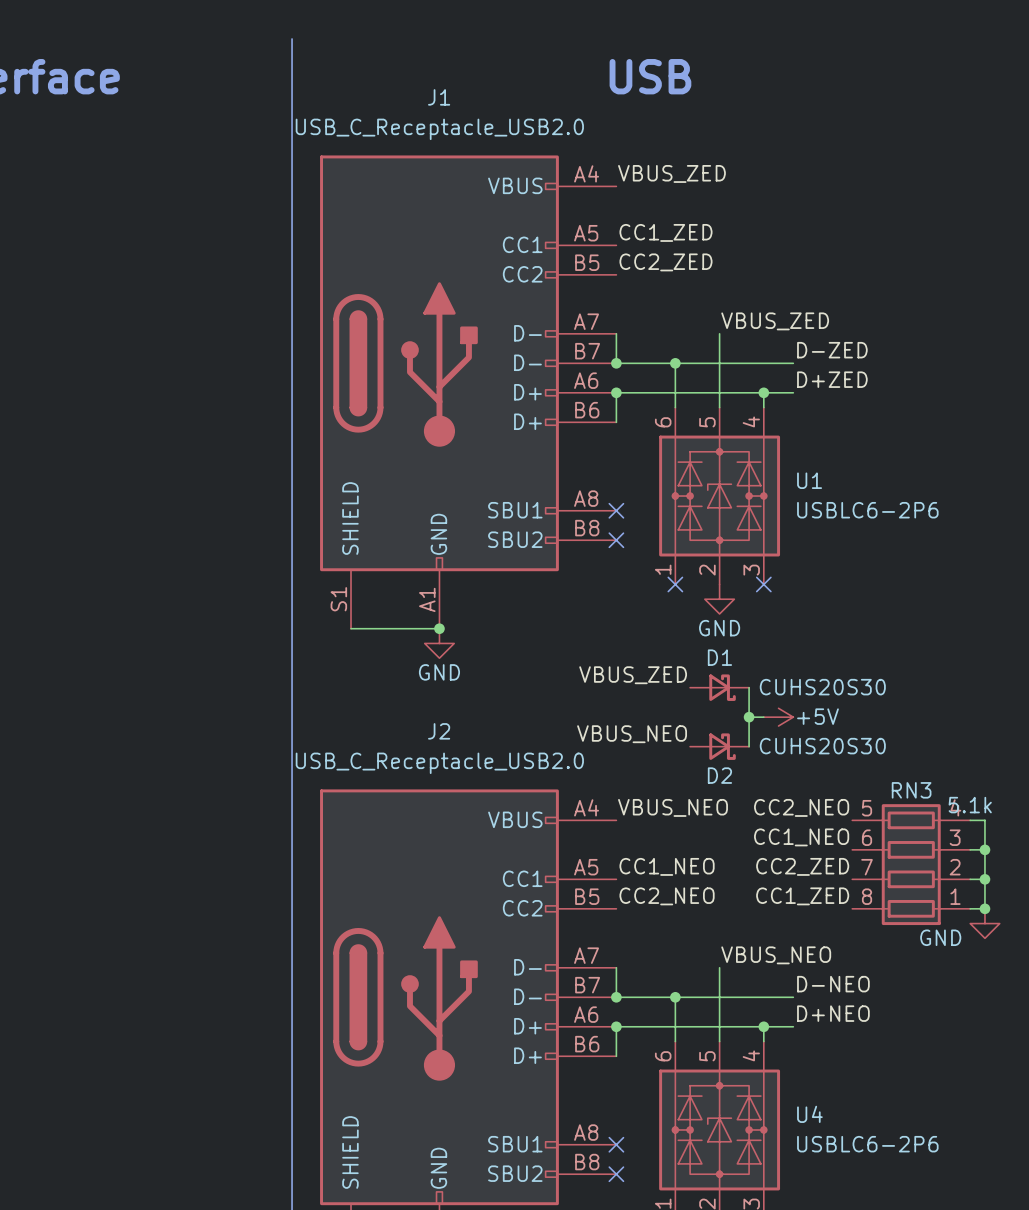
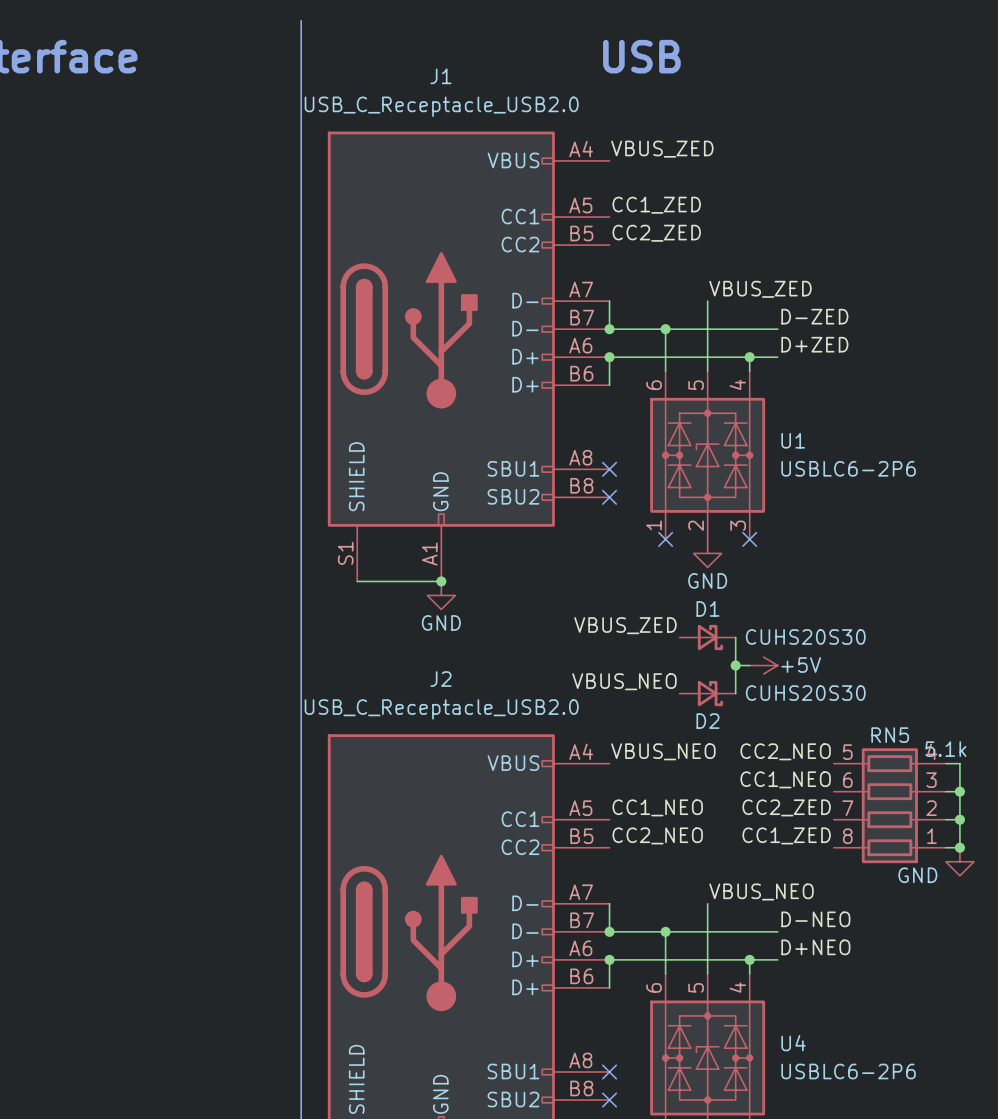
RN3 name: RN3 (911, 790) -> RN5 (890, 735)

